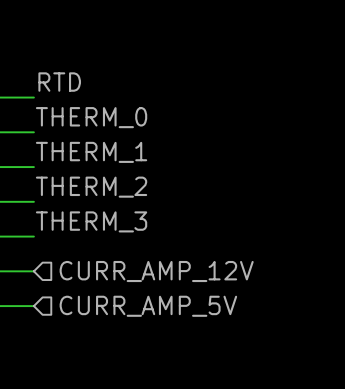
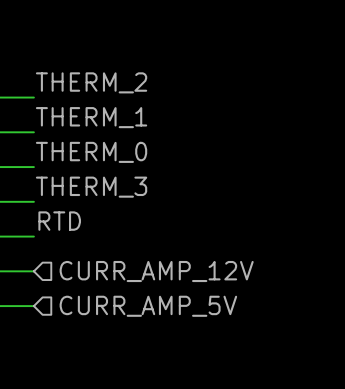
label: RTD (59, 82) -> THERM_2 (91, 82)
label: THERM_0 (91, 117) -> THERM_1 (91, 117)
label: THERM_1 (91, 152) -> THERM_0 (91, 152)
label: THERM_2 (91, 187) -> THERM_3 (91, 187)
label: THERM_3 (91, 221) -> RTD (59, 221)

